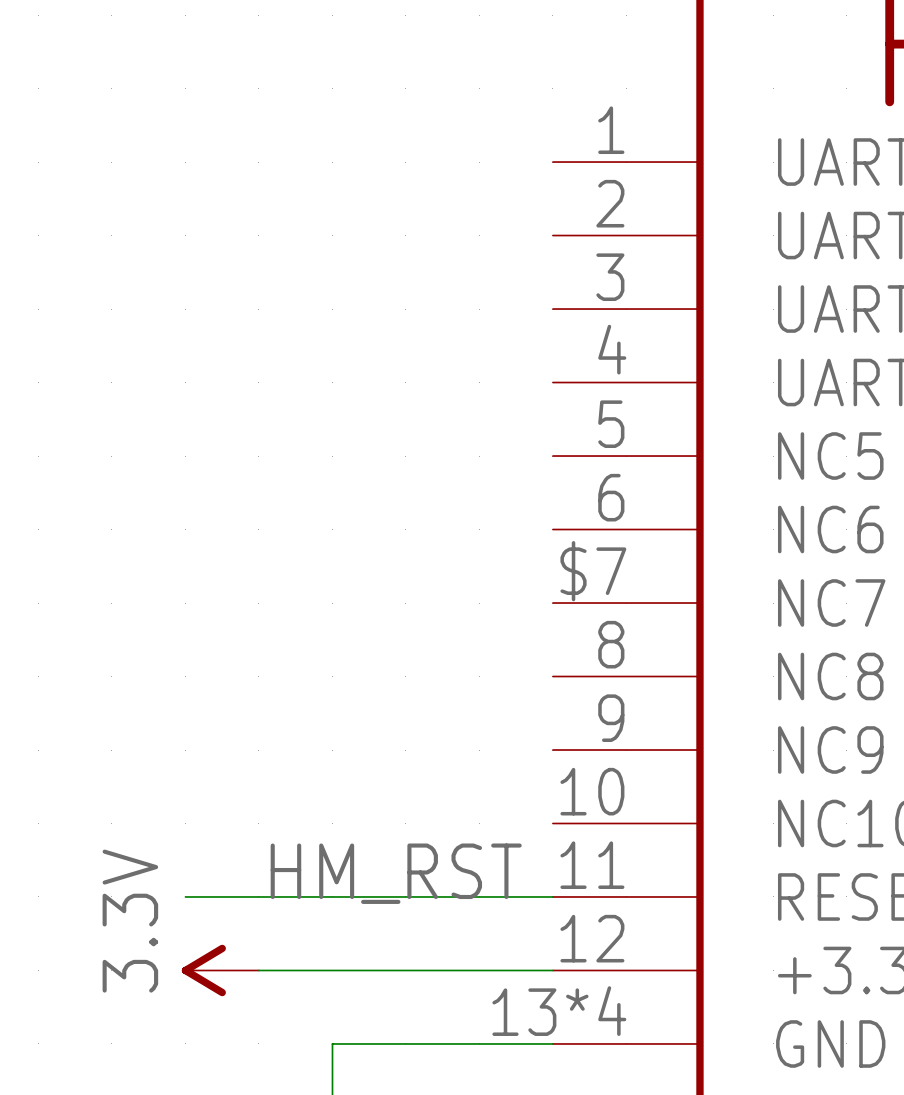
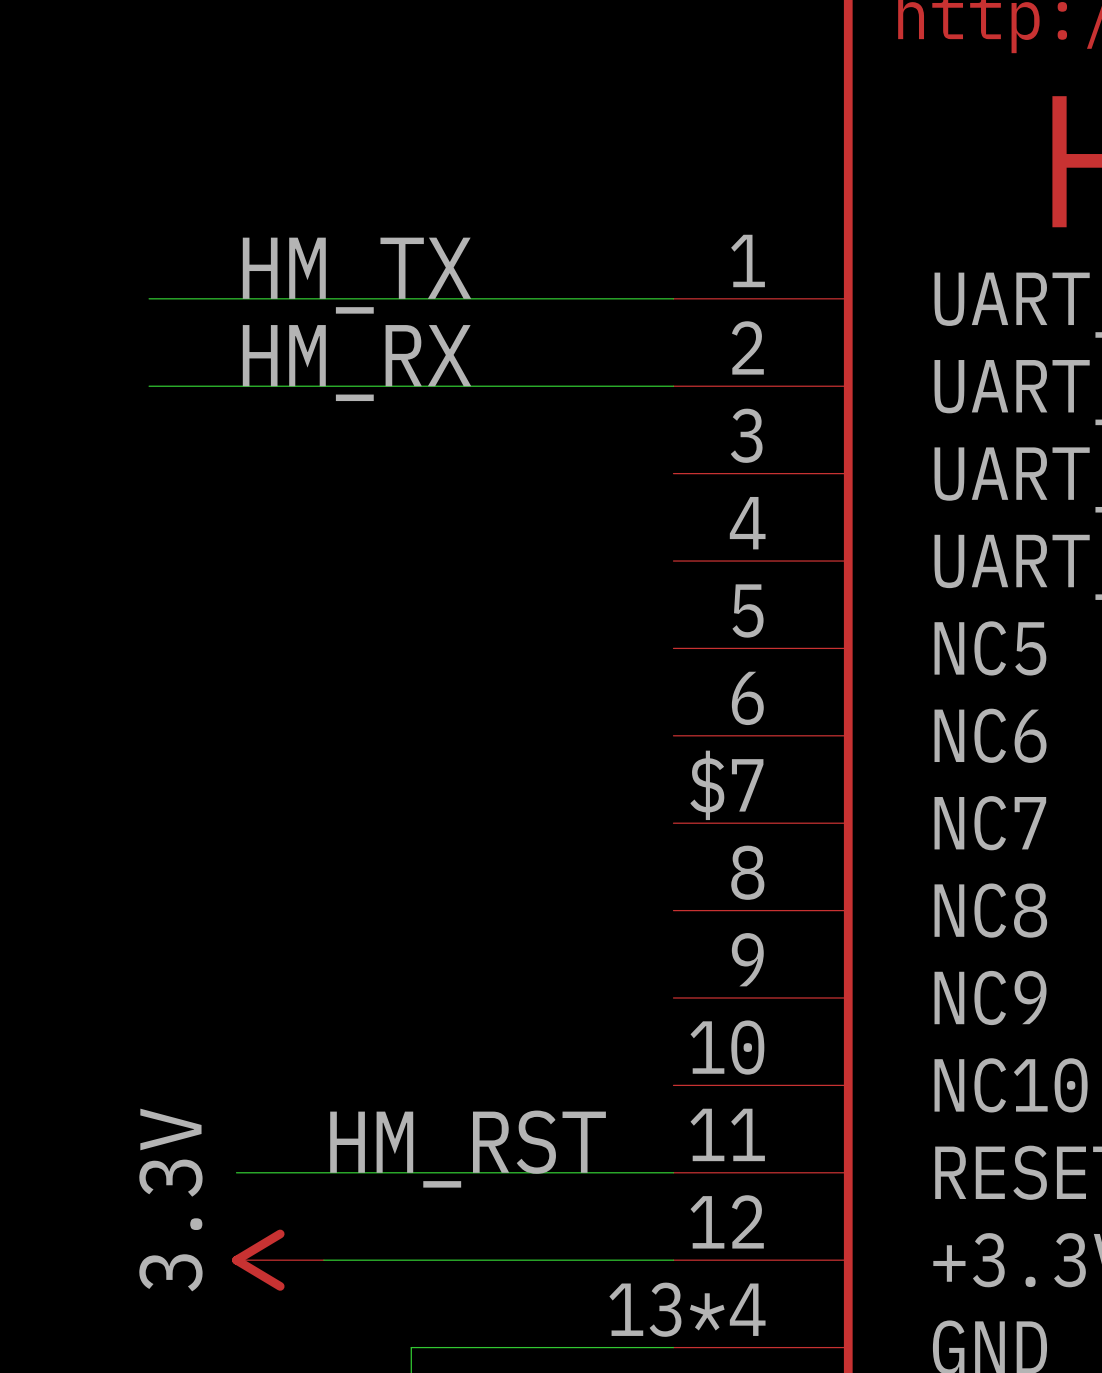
label: none -> HM_TX (356, 275)
wire: none -> (149, 298) (673, 298)
label: none -> HM_RX (356, 363)
wire: none -> (149, 386) (673, 386)

